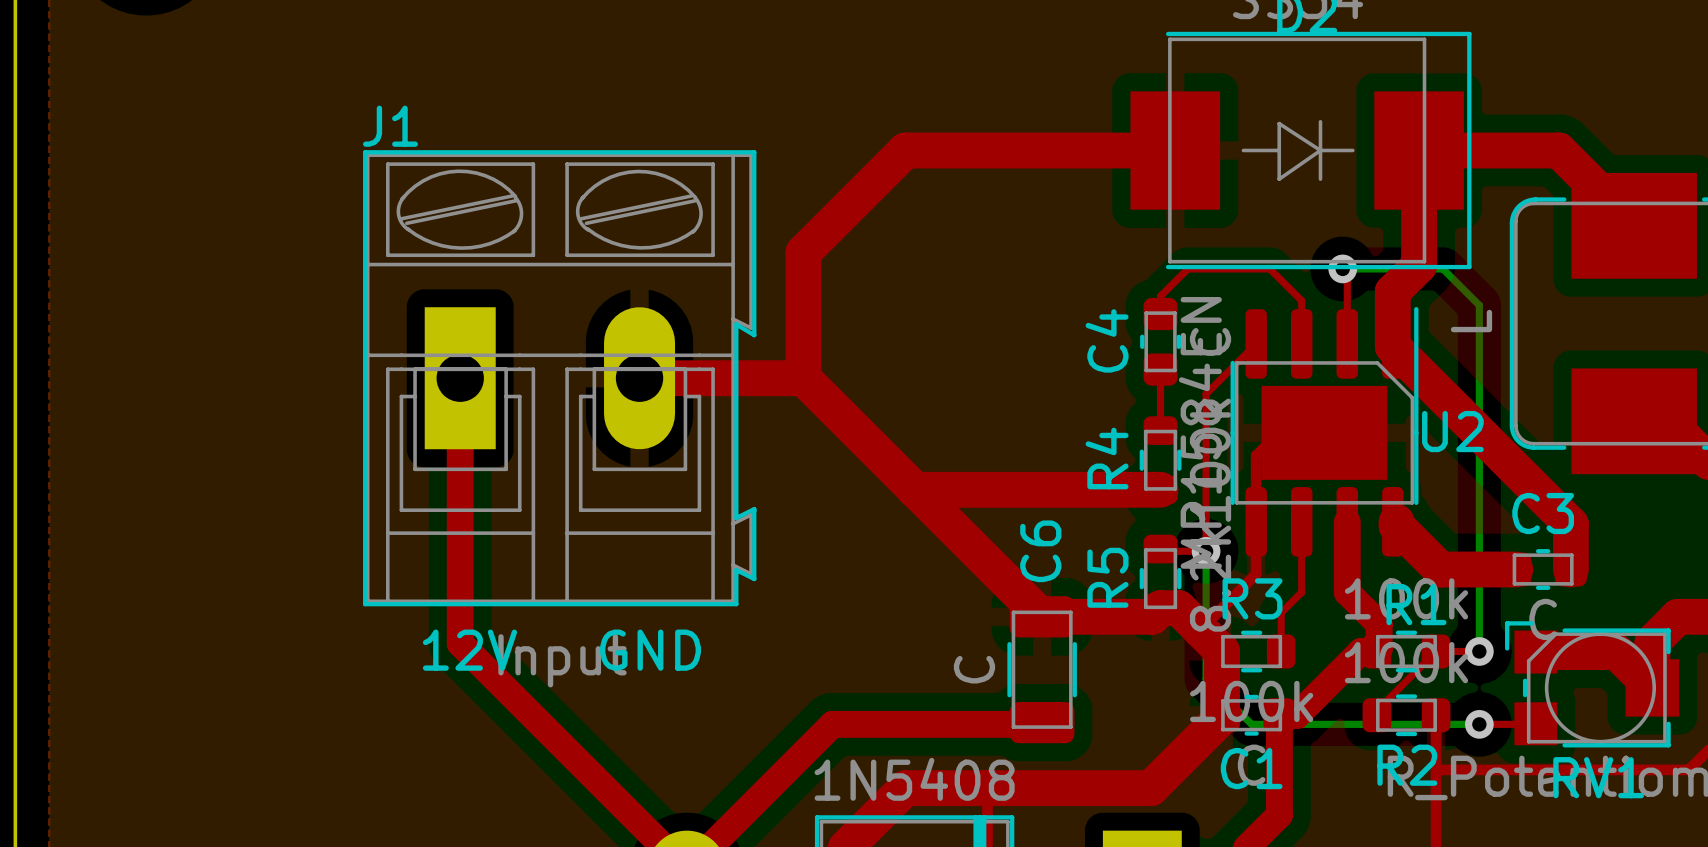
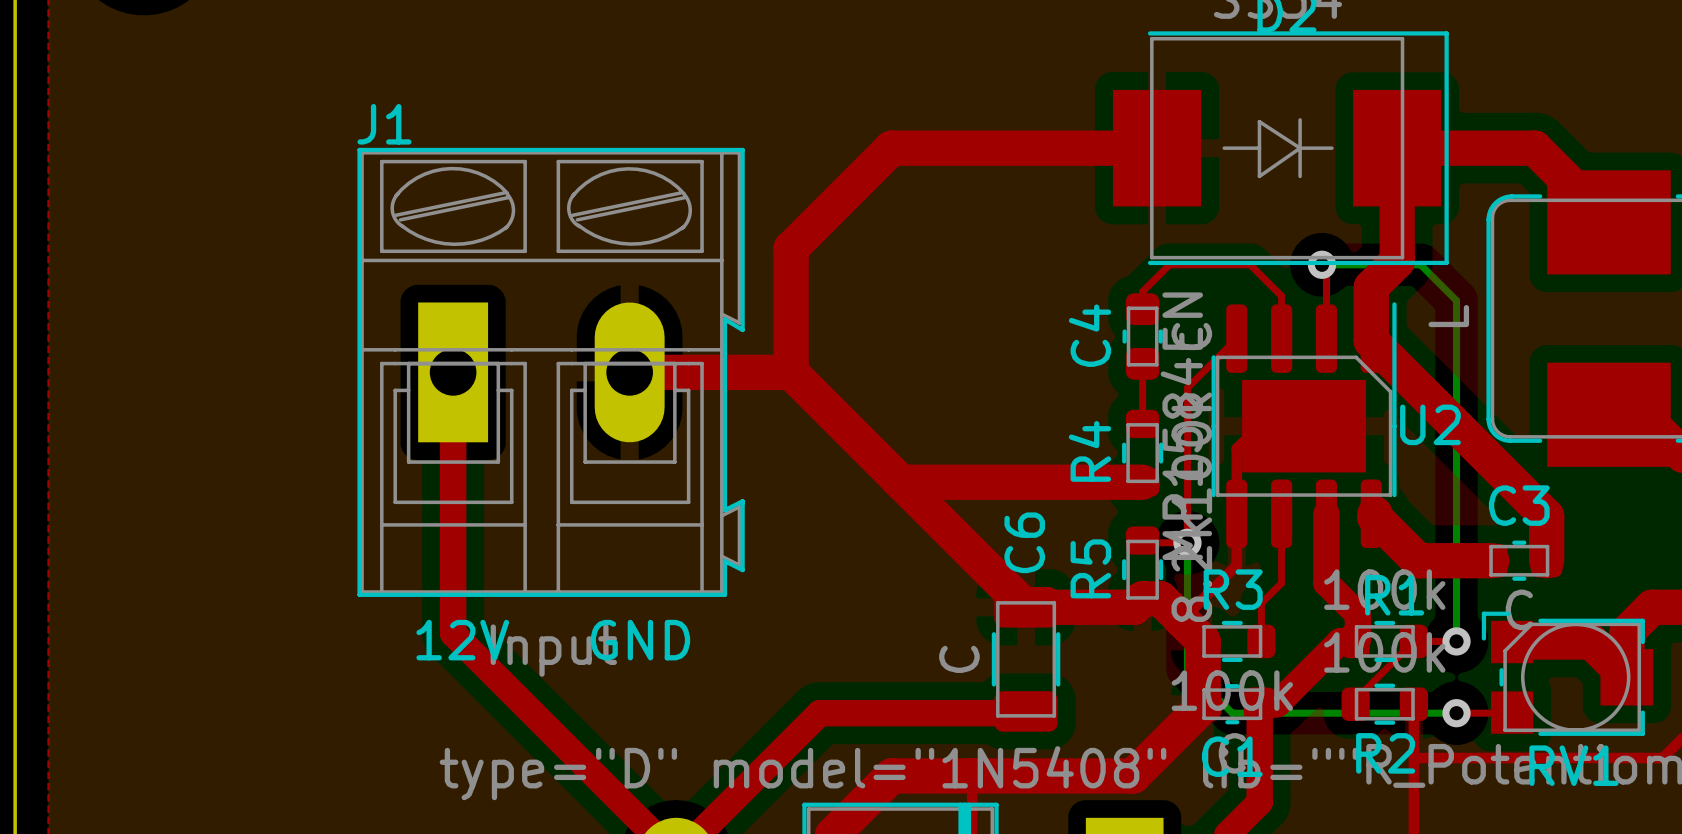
part value: 1N5408 (914, 779) -> type="D" model="1N5408" lib="" (898, 773)

